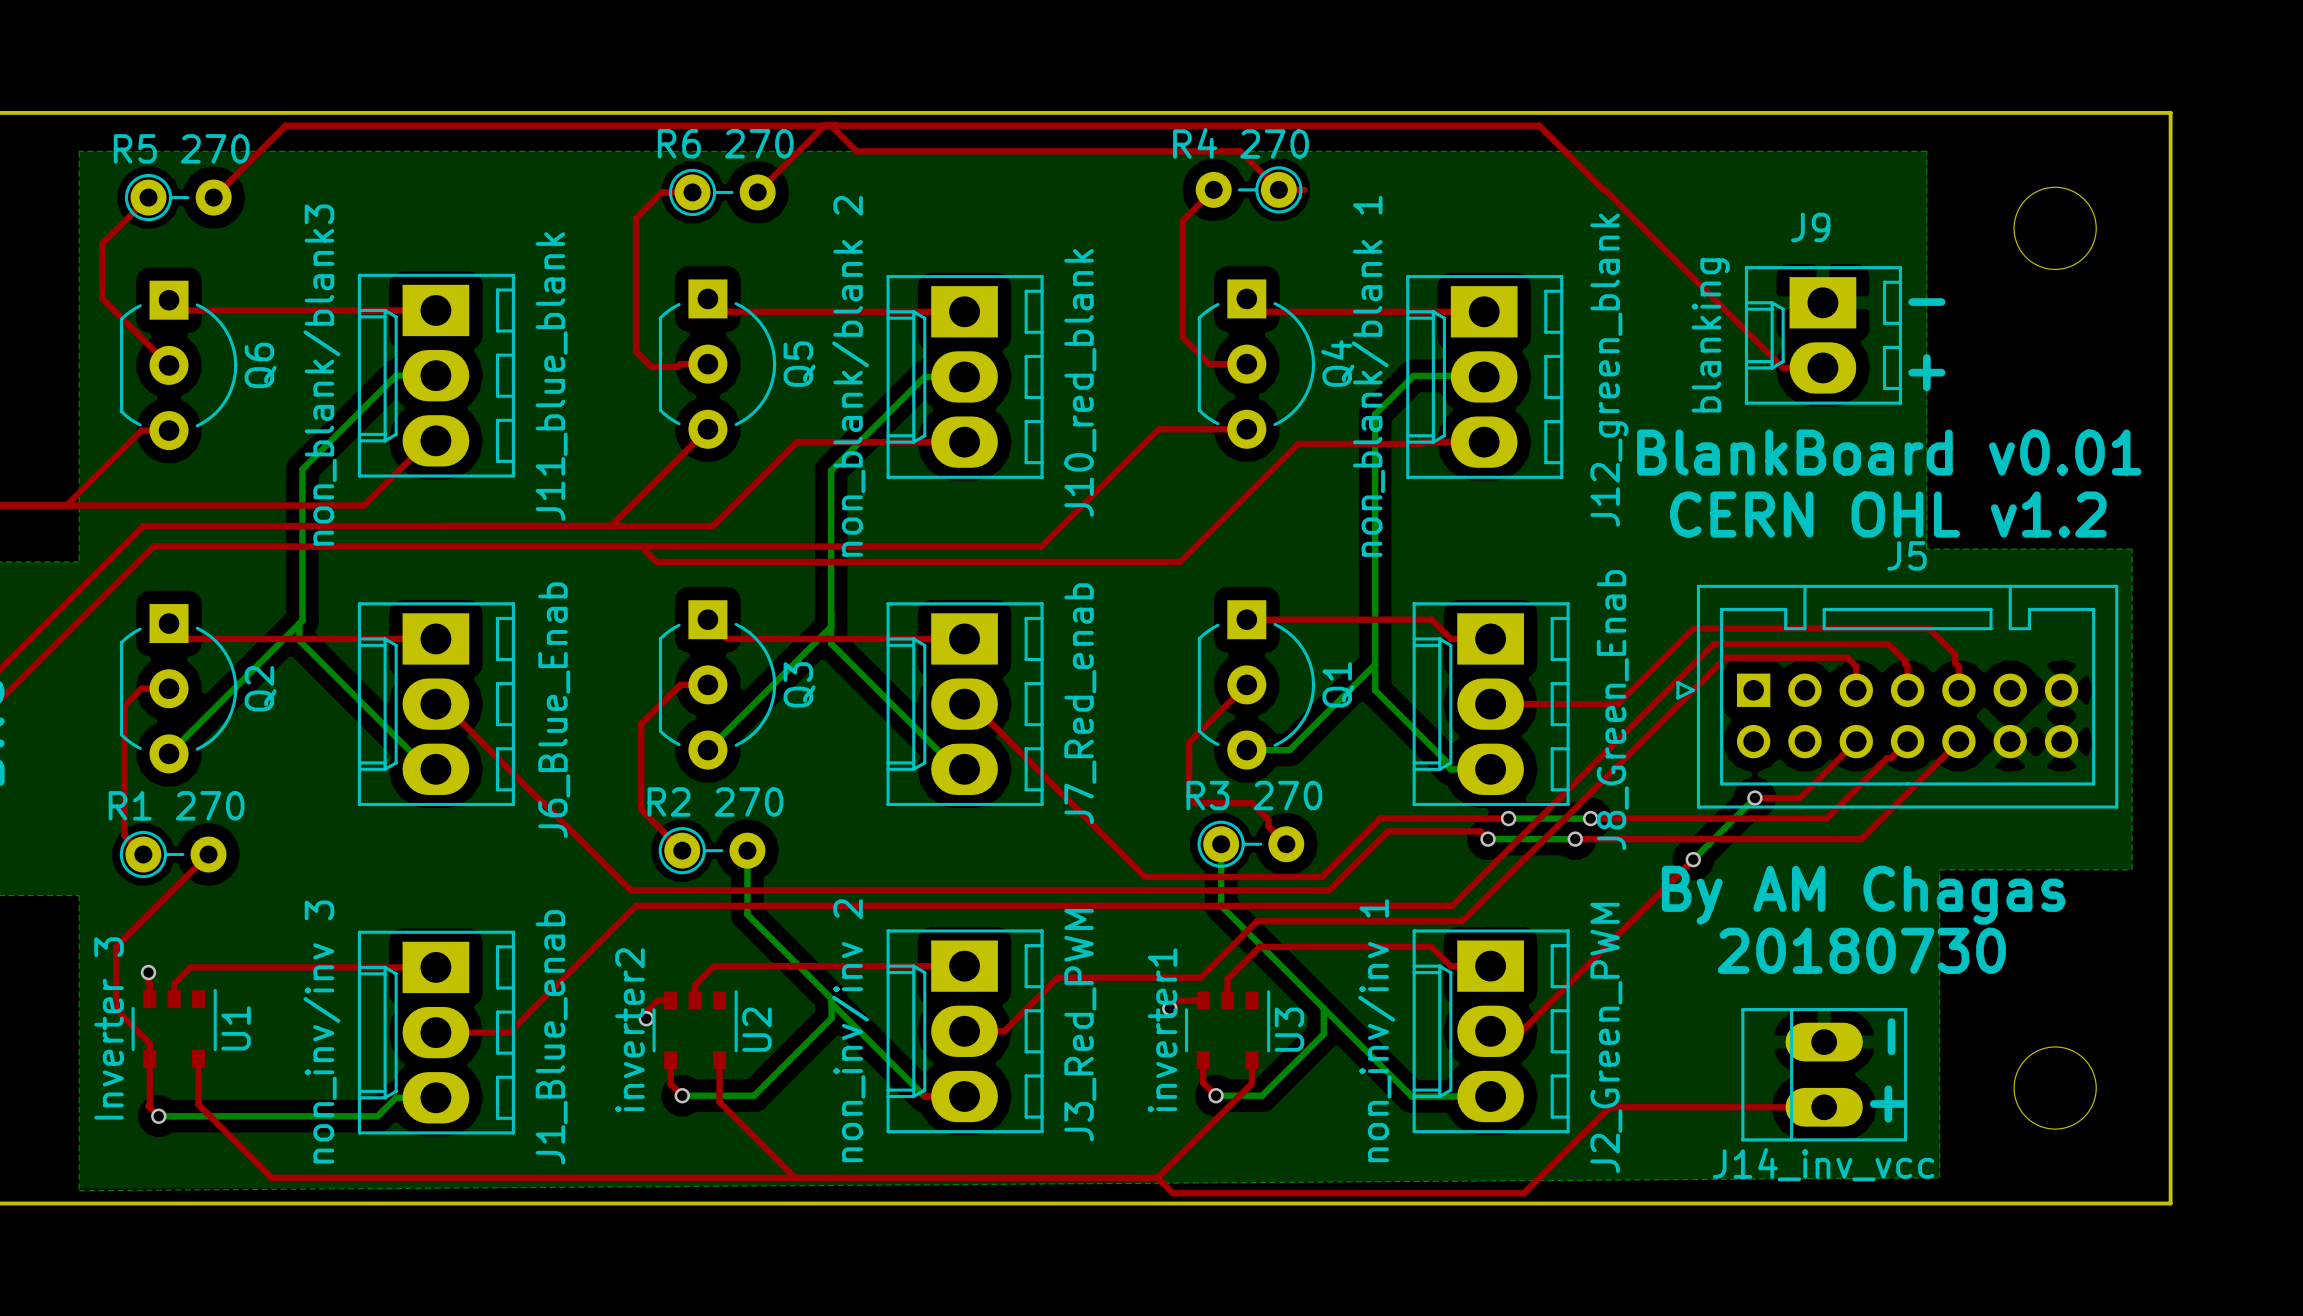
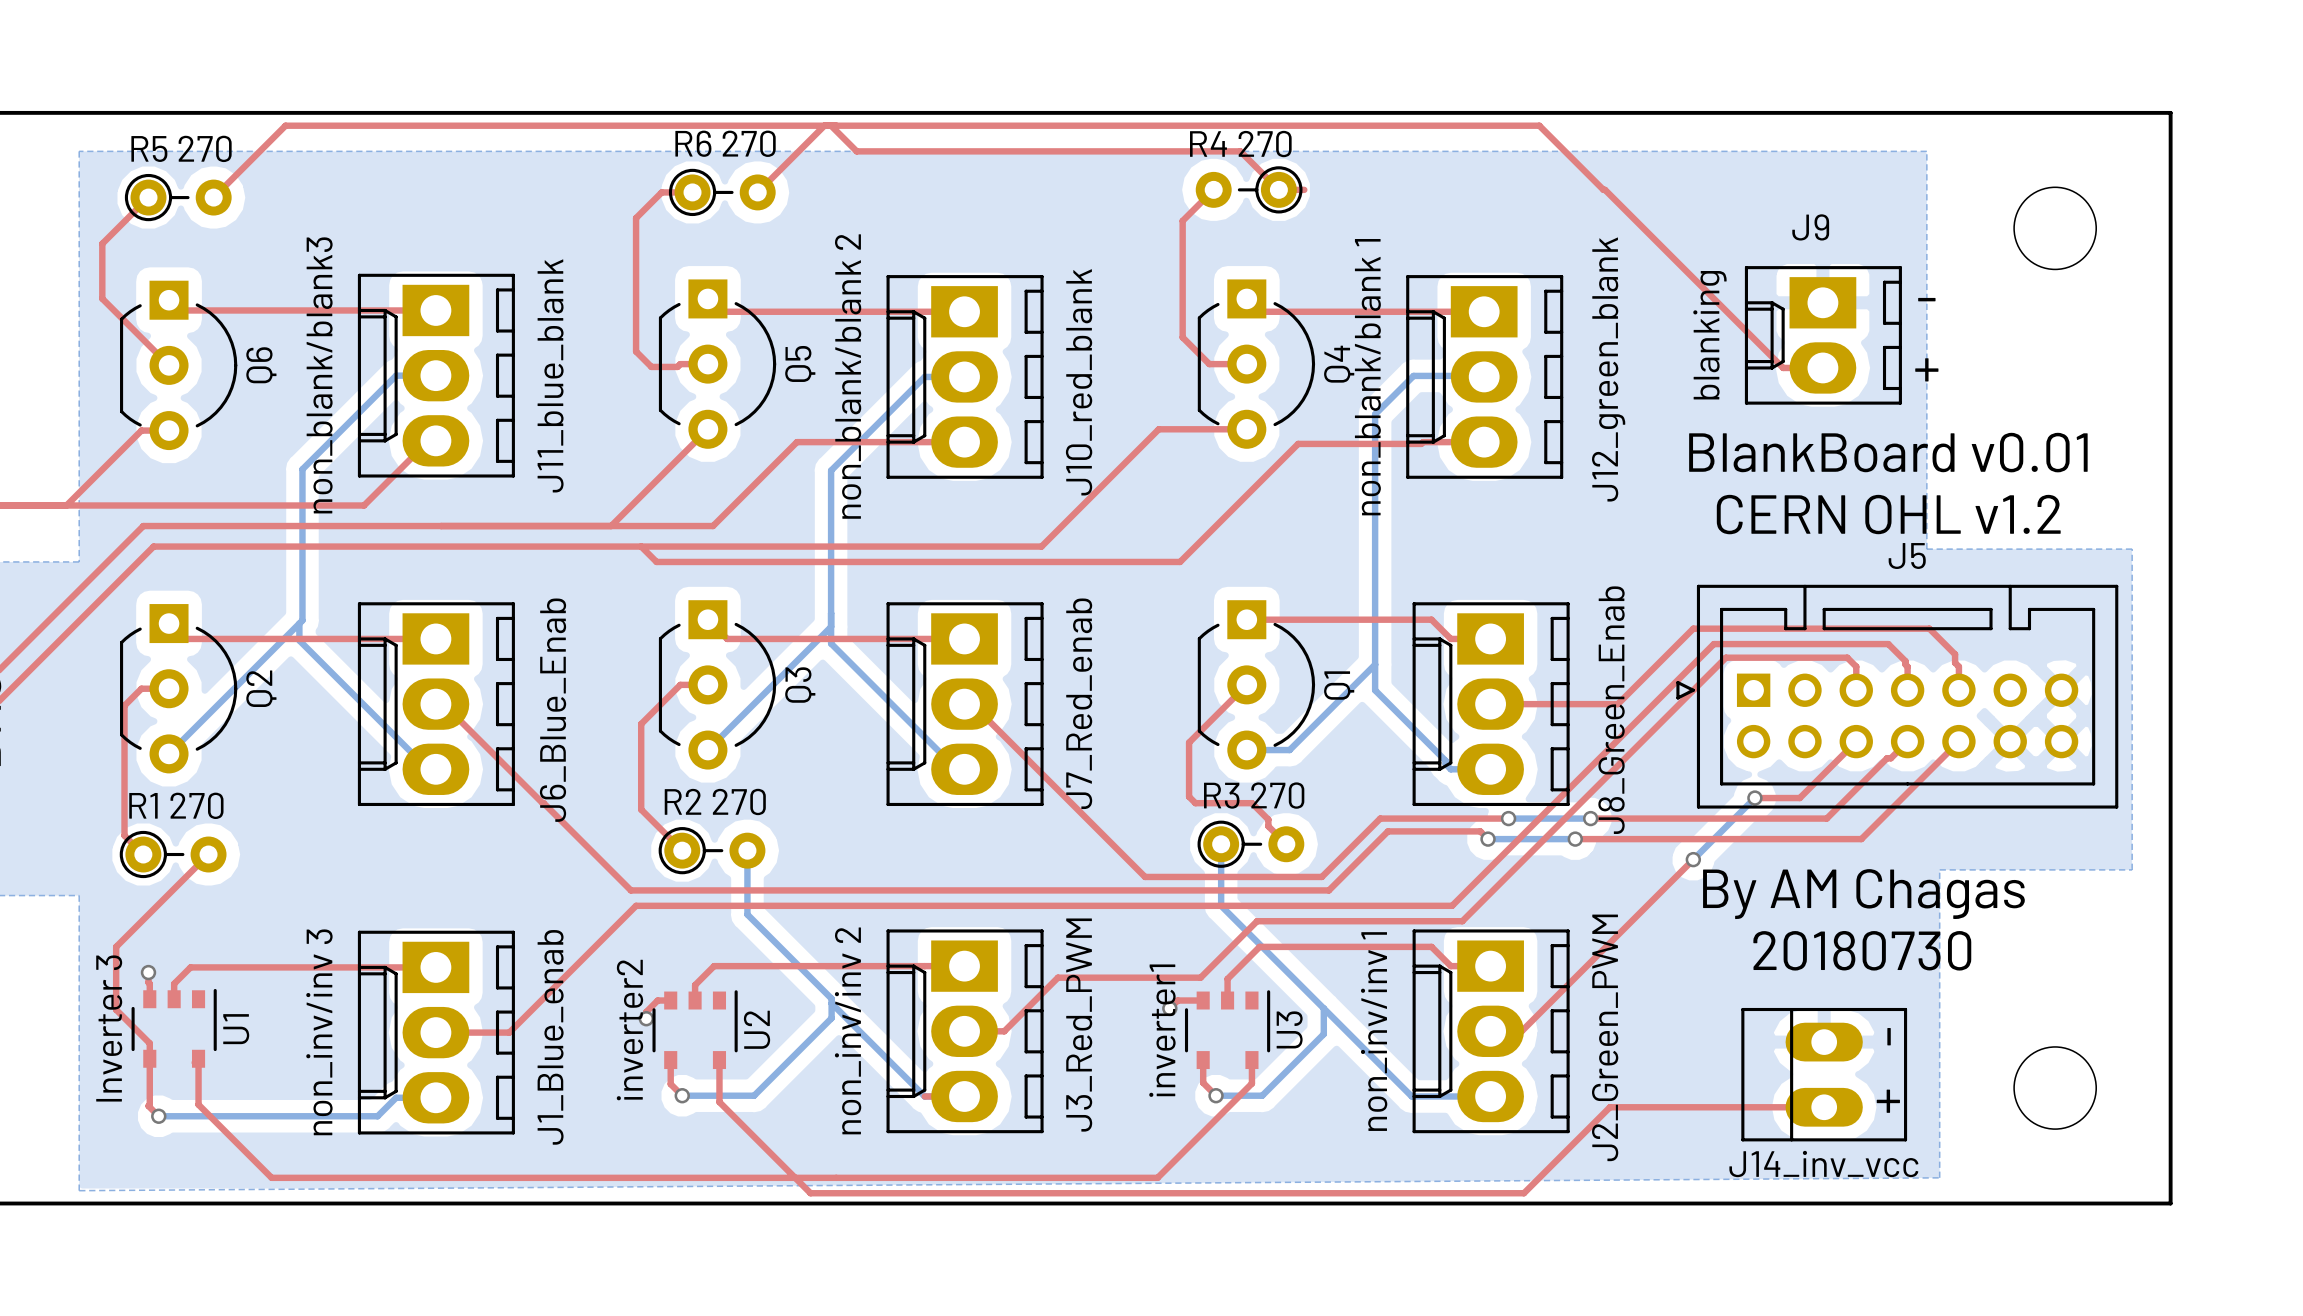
top track: (1157, 1177) (1173, 1193) -> (795, 1177) (810, 1193) (1173, 1193)

